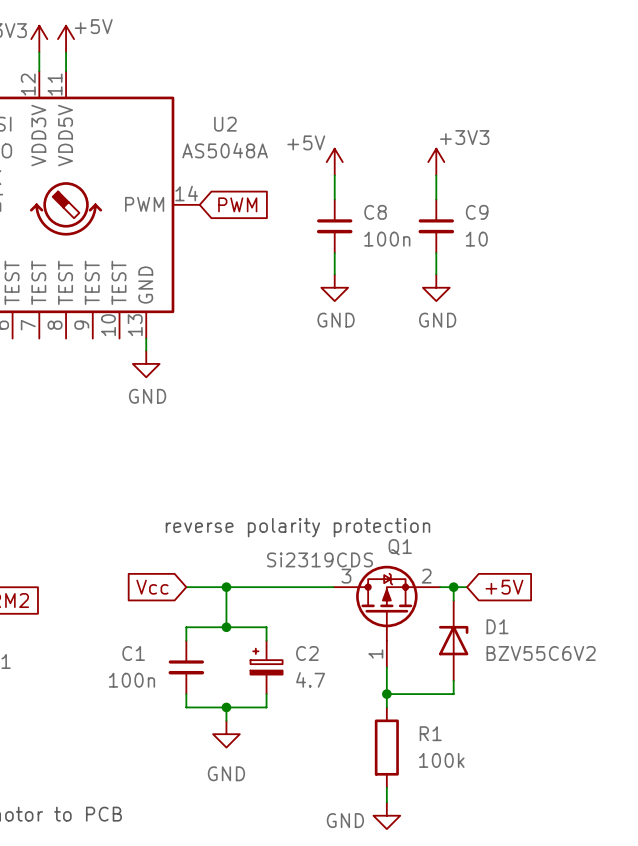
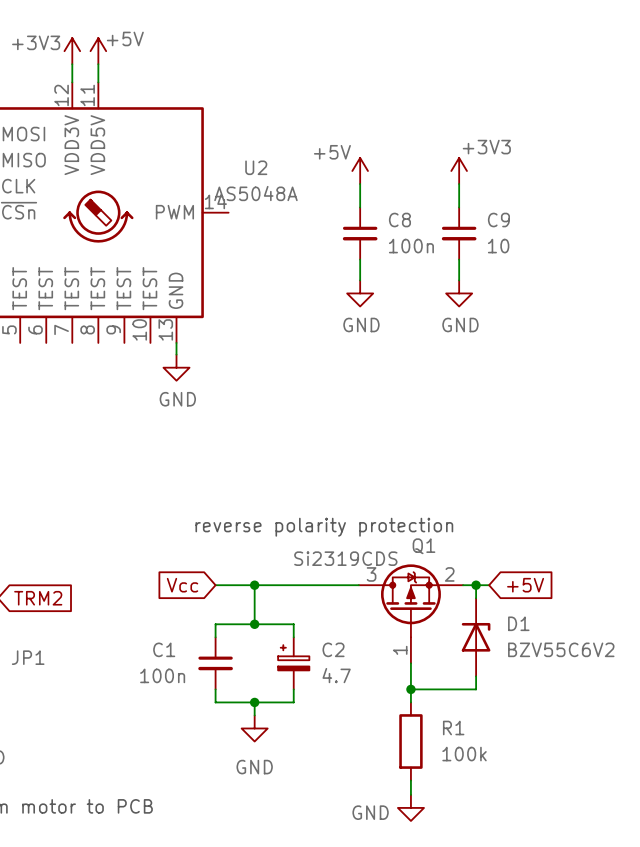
U2 name position: U2 (225, 124) -> U2 (256, 167)
U2 value position: AS5048A (225, 150) -> AS5048A (255, 193)
global label: PWM (237, 204) -> none

